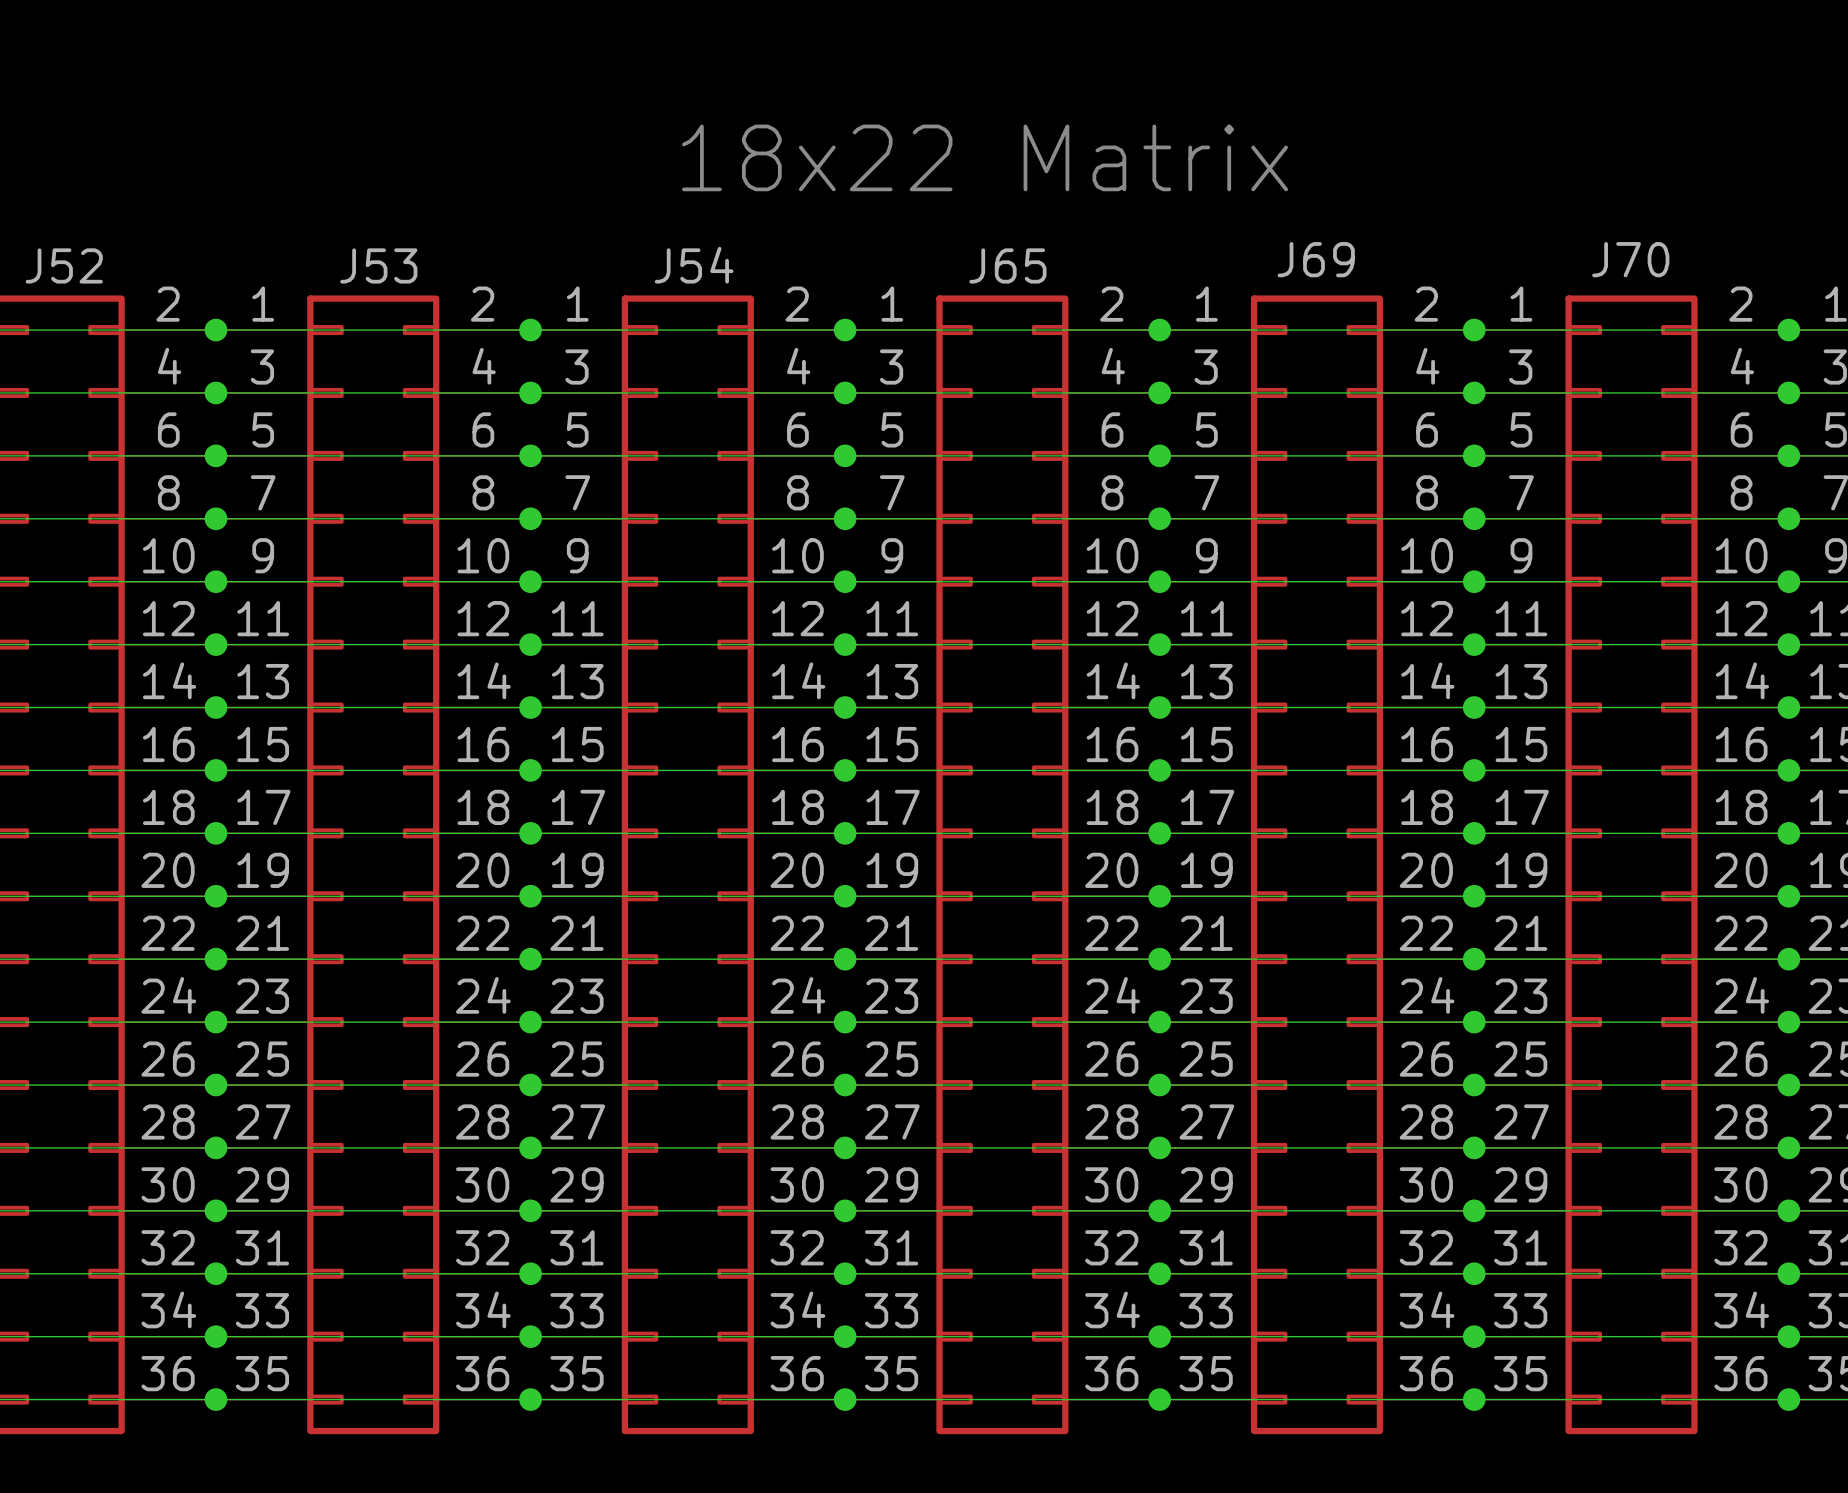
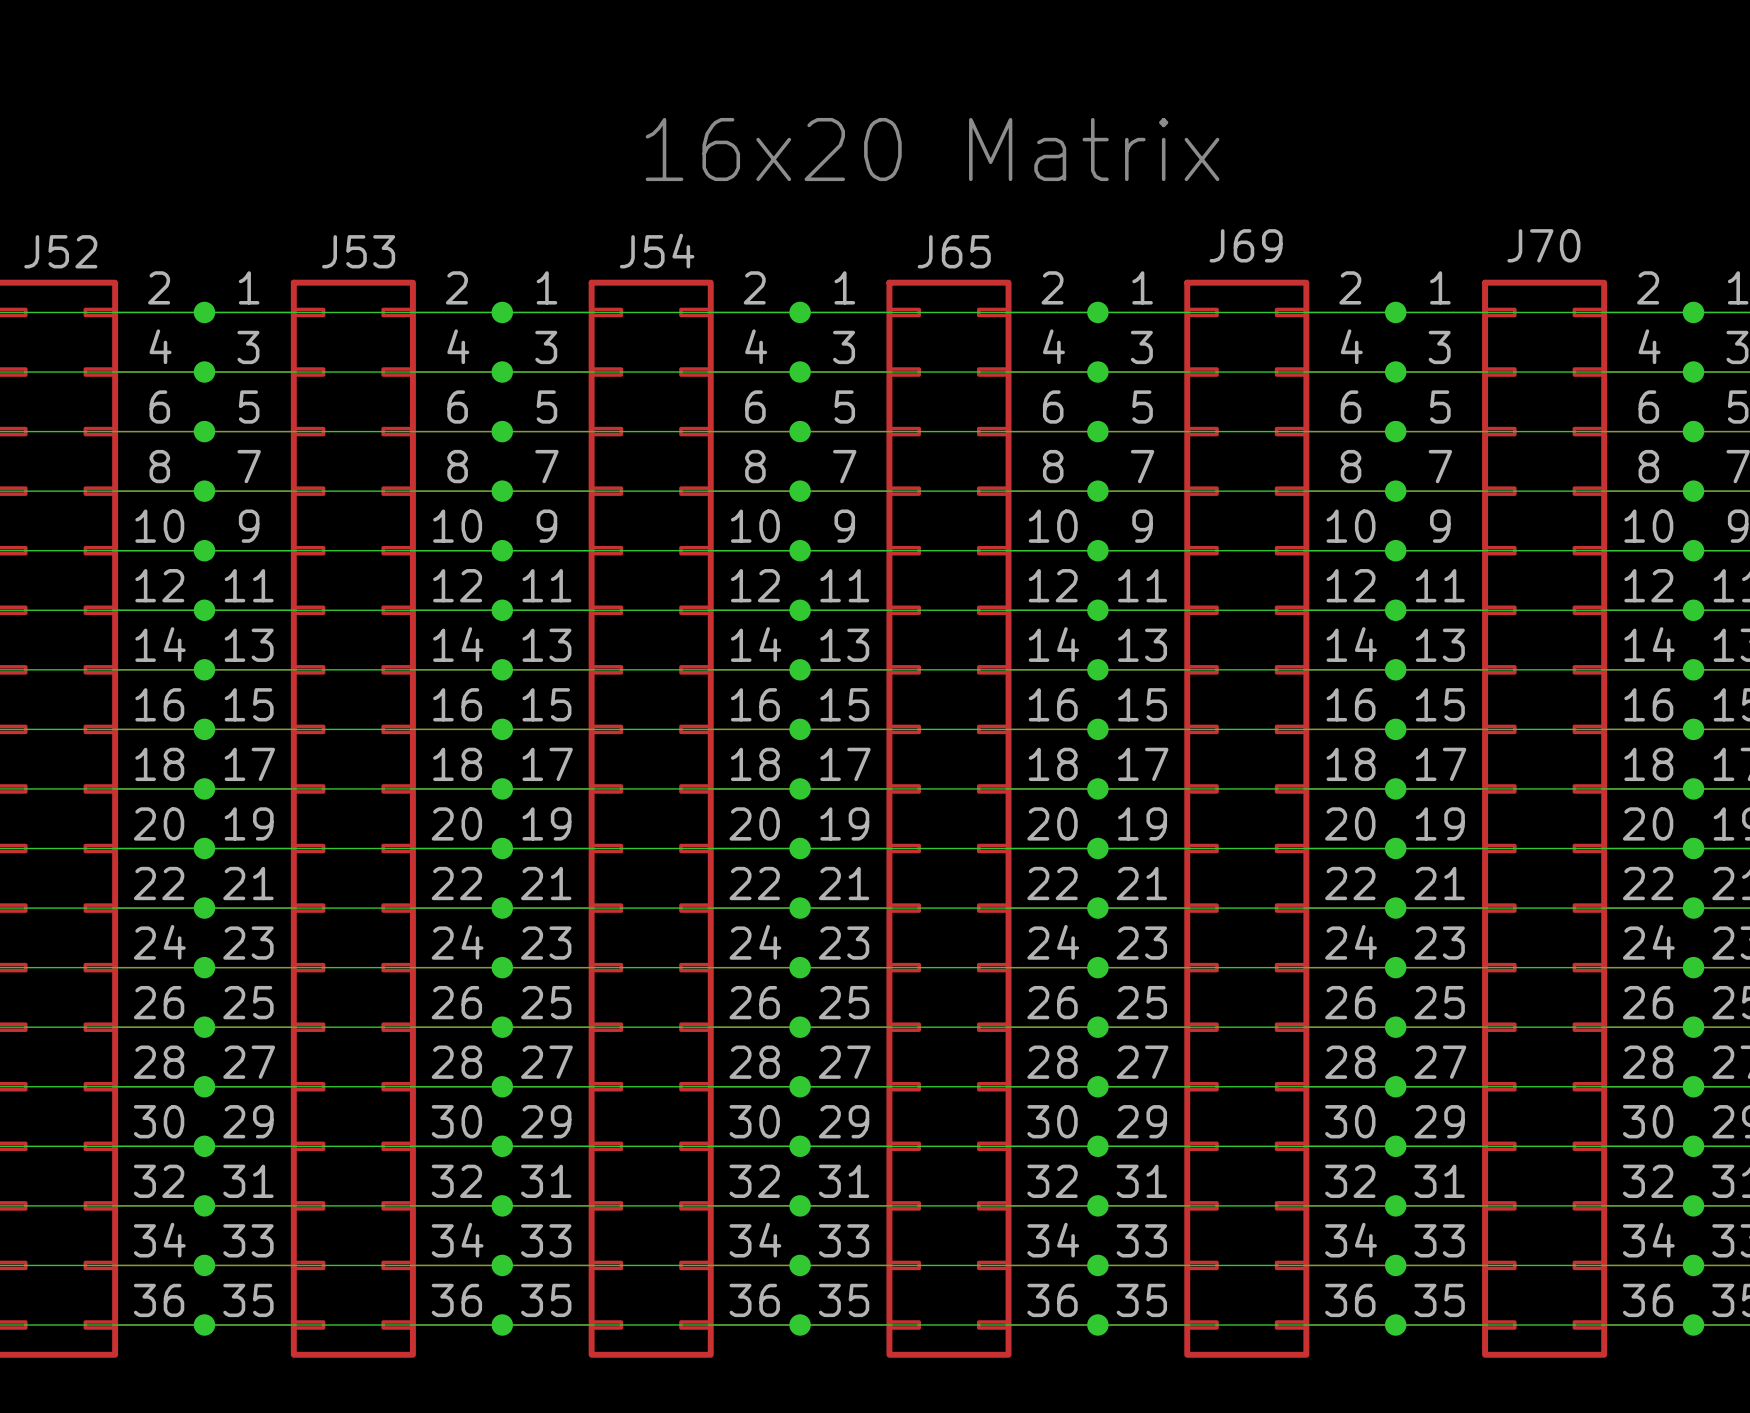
text: 18x22 Matrix (985, 157) -> 16x20 Matrix (932, 149)

